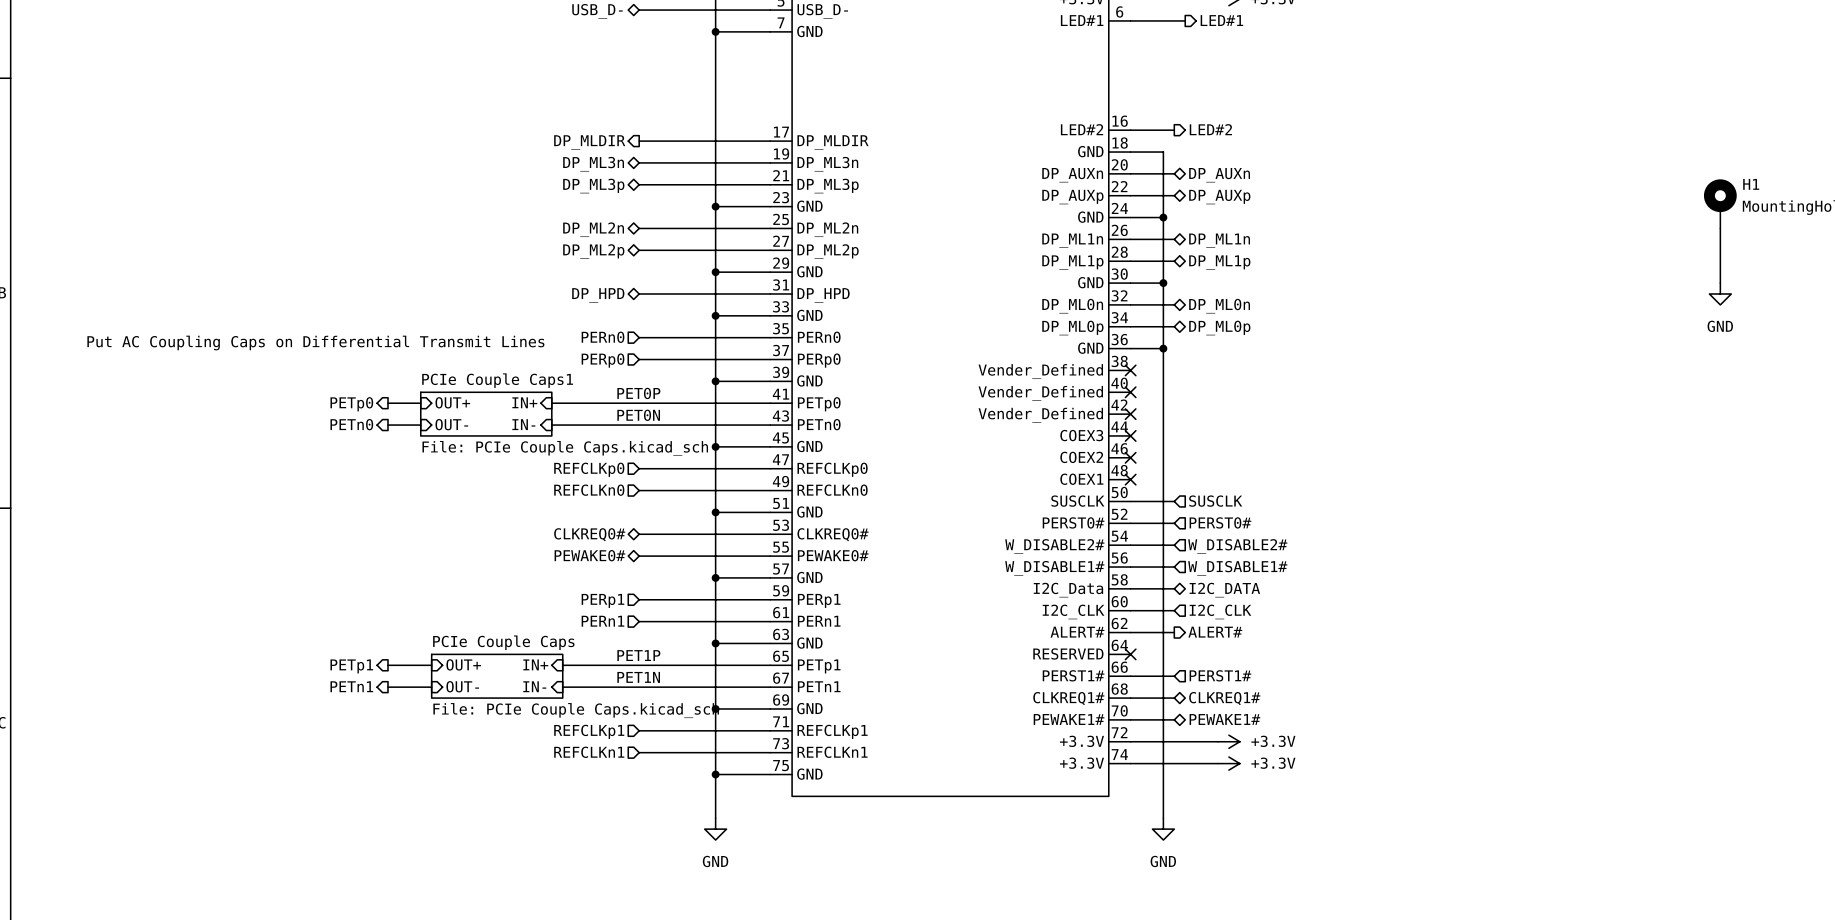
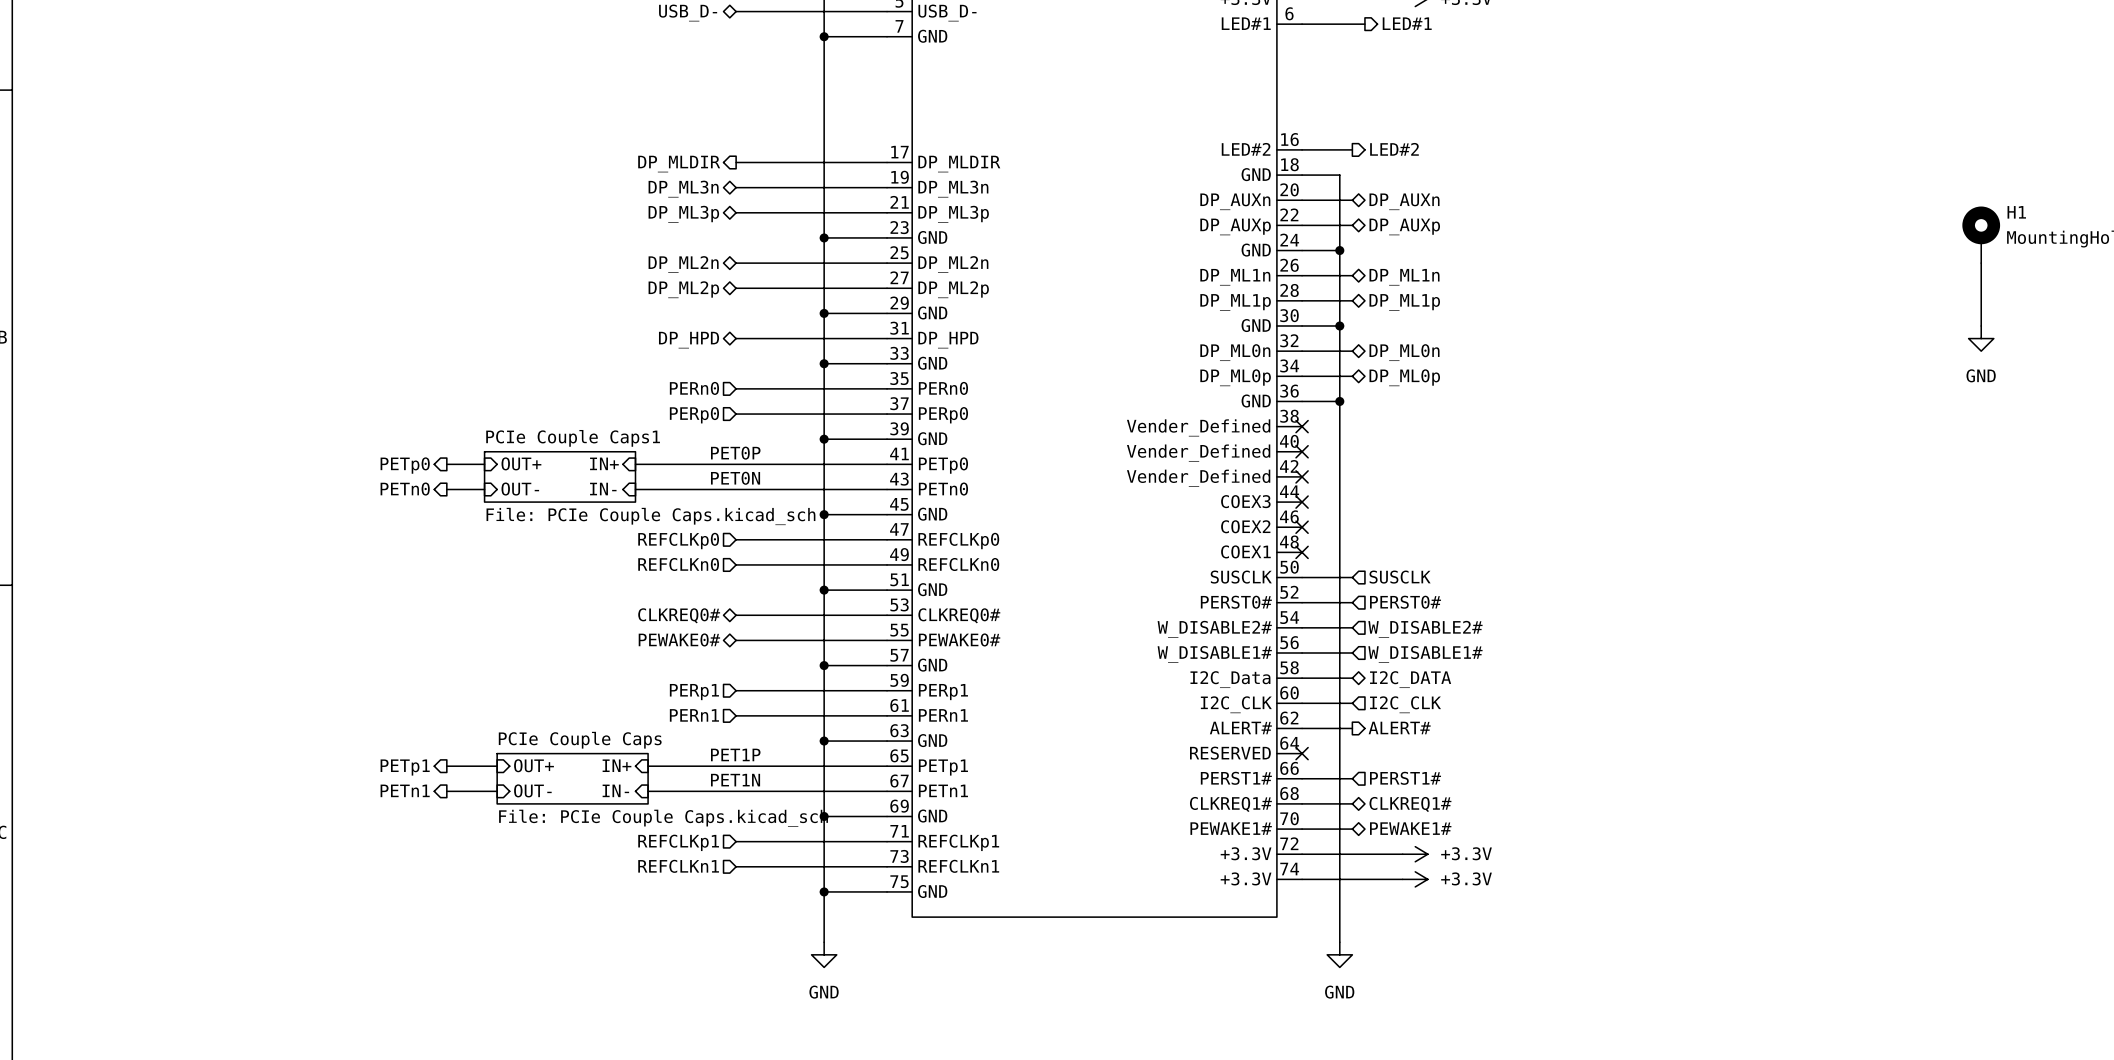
text: Put AC Coupling Caps on Differential Transmit Lines (315, 343) -> none

